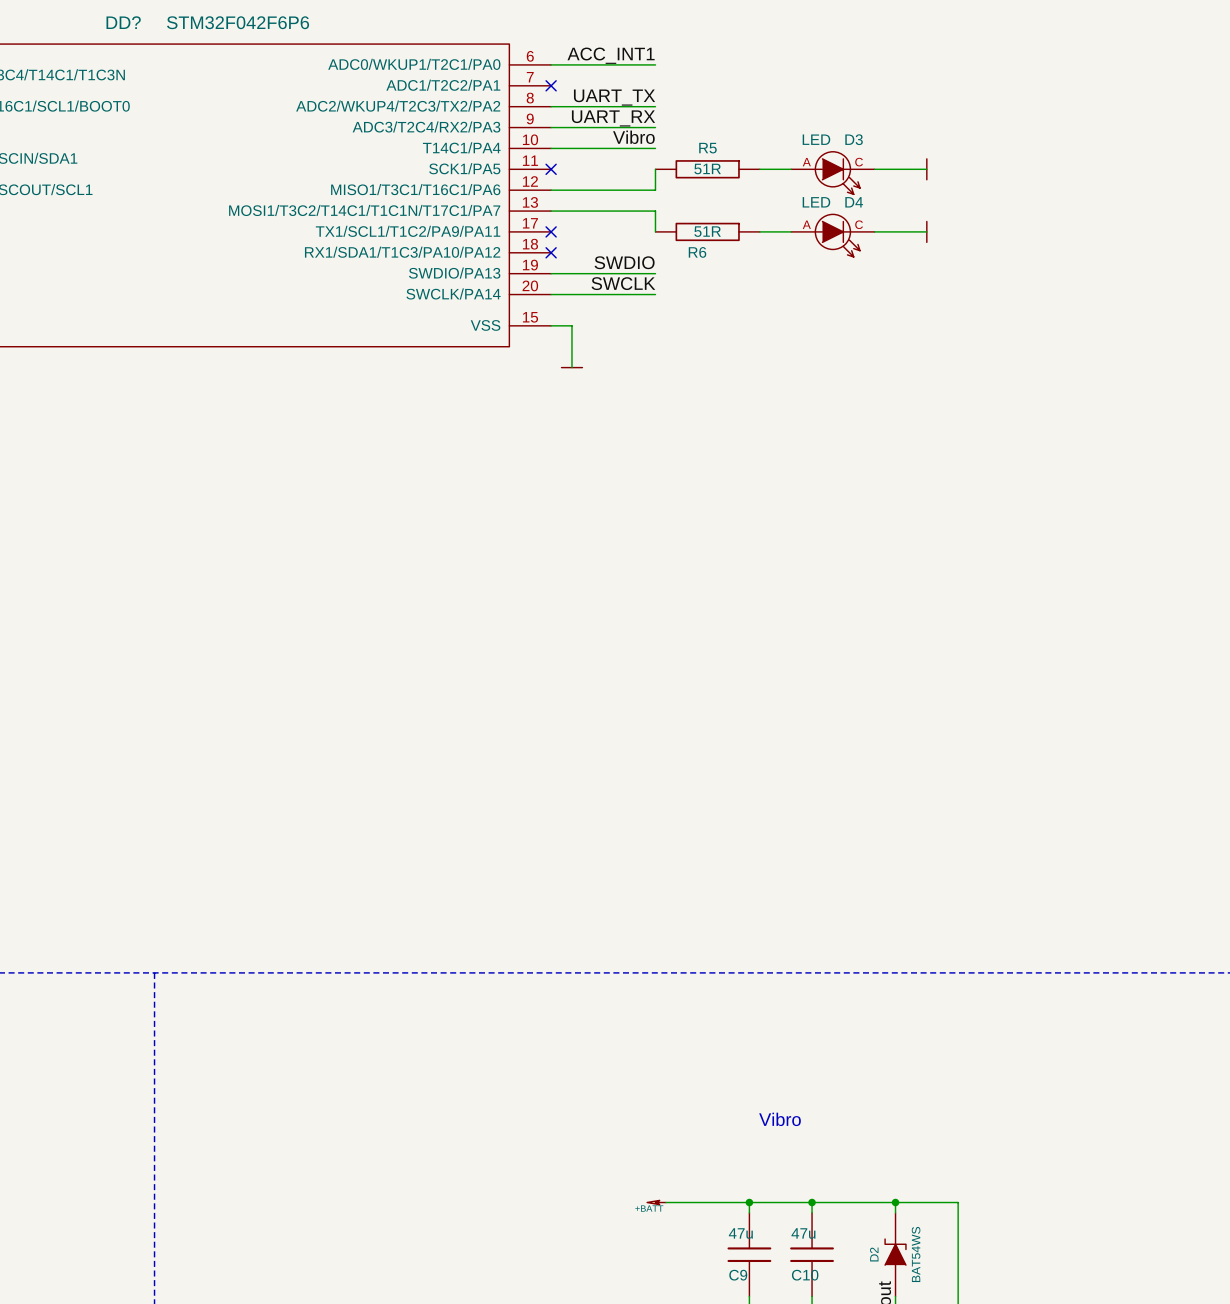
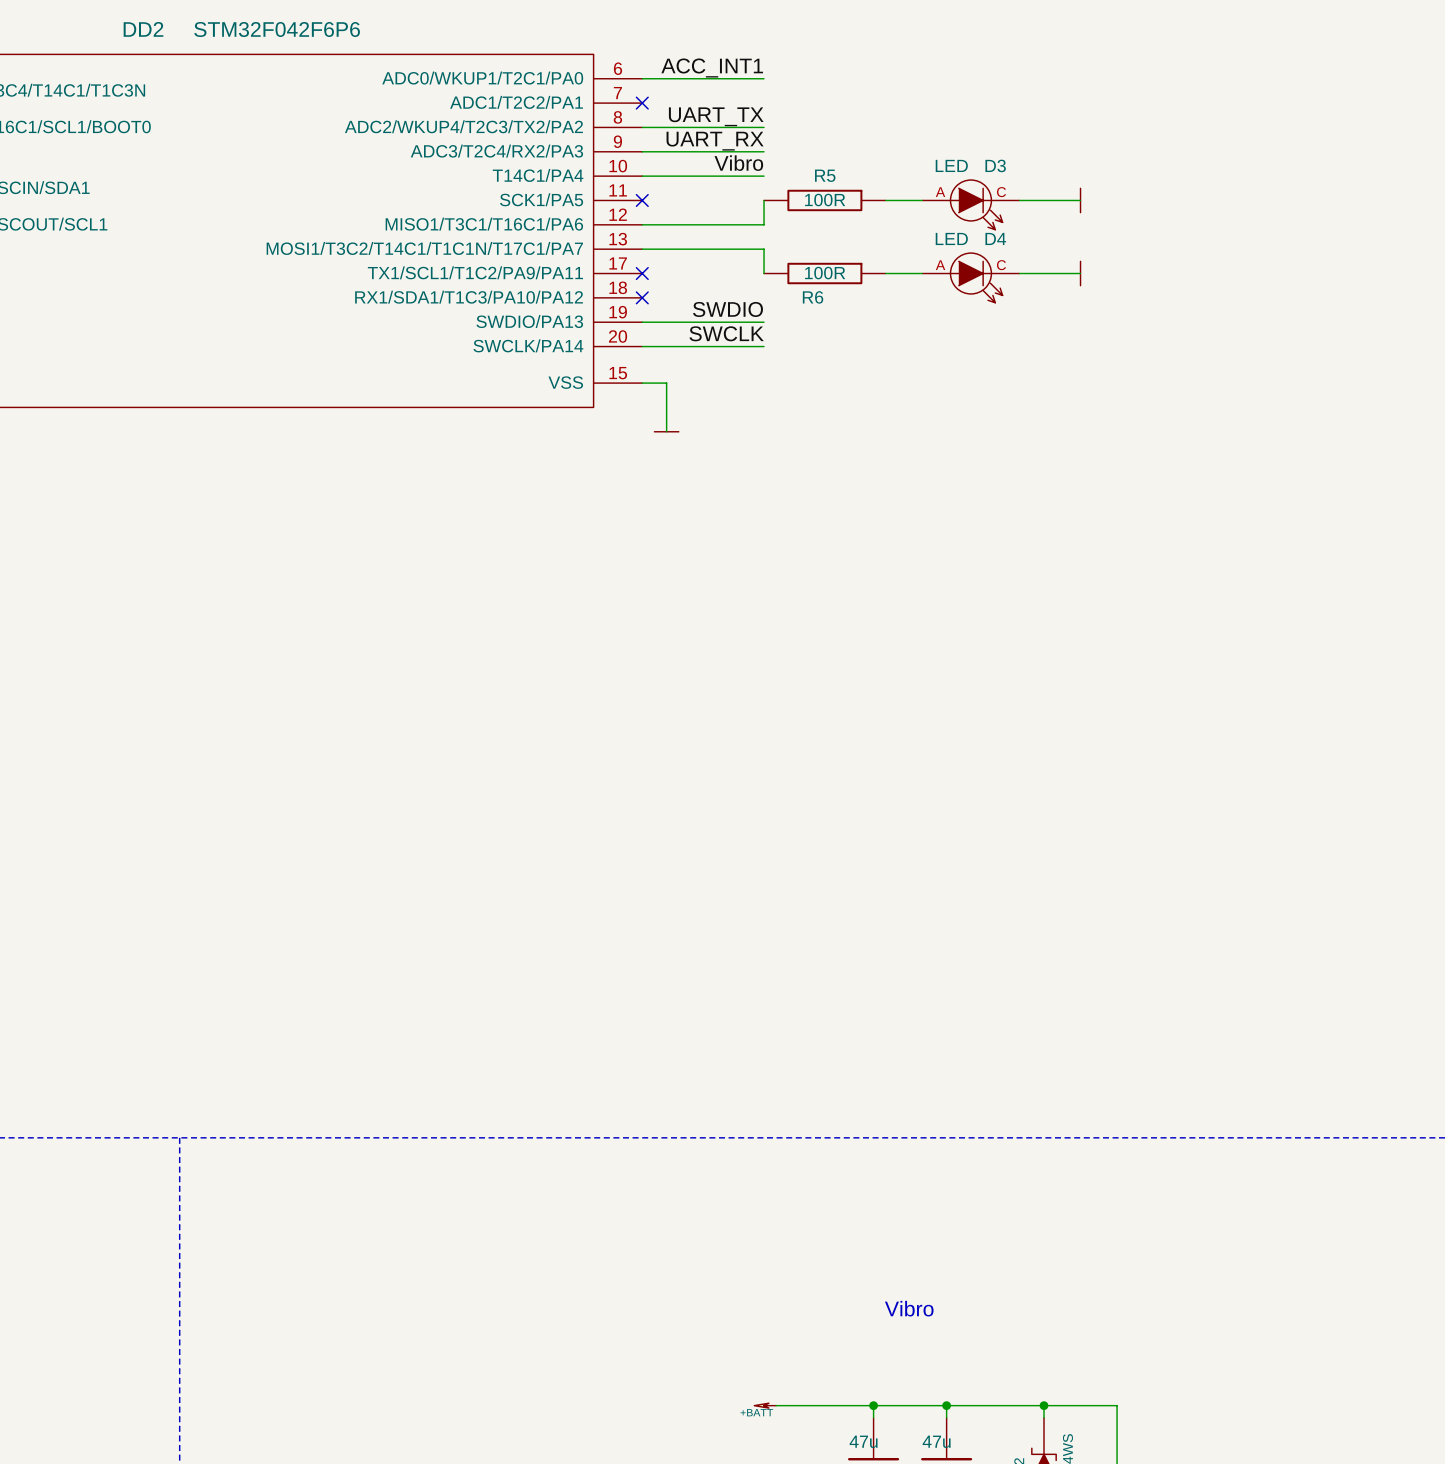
DD? name: DD? (123, 22) -> DD2 (143, 29)
R5 value: 51R (707, 168) -> 100R (825, 200)
R6 value: 51R (707, 231) -> 100R (825, 273)

